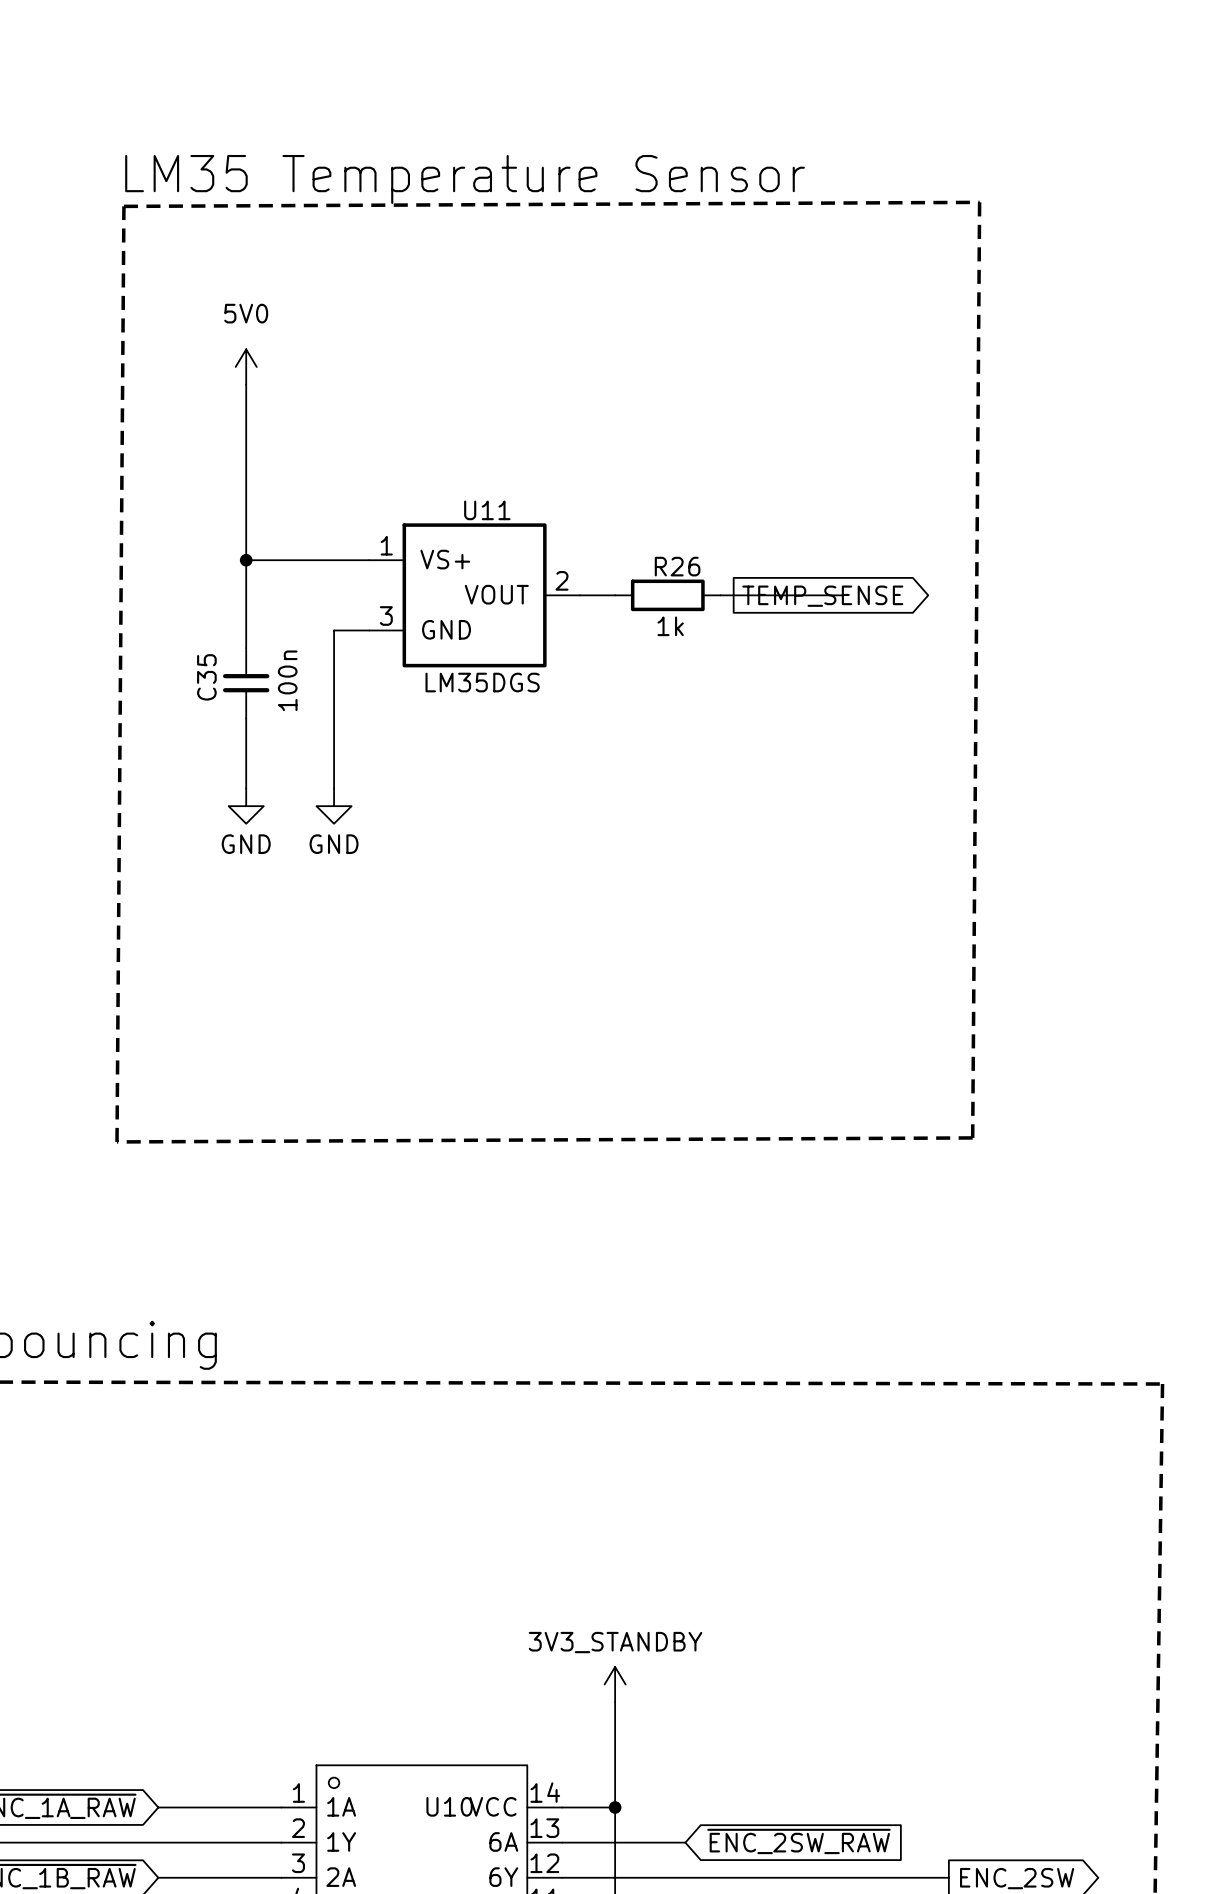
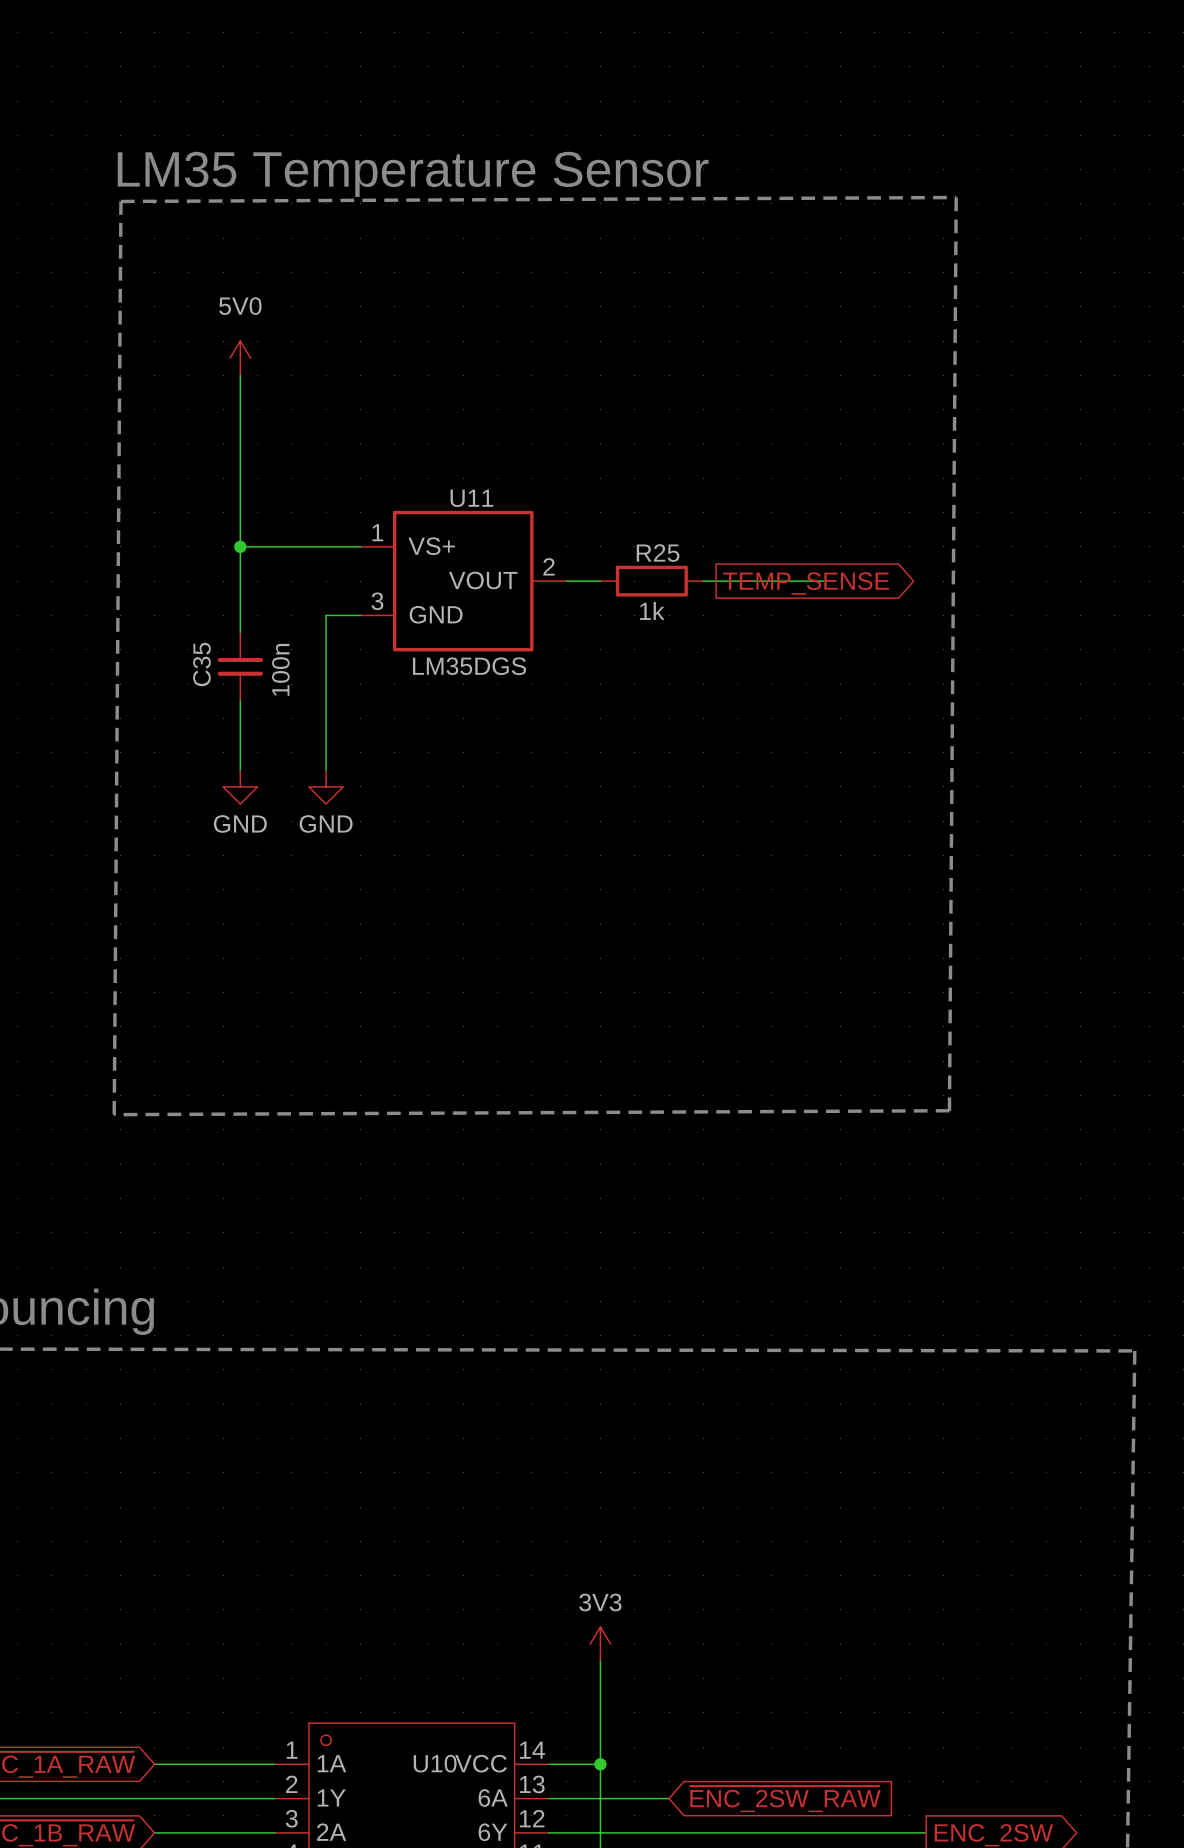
R26 name: R26 (677, 566) -> R25 (658, 553)
power symbol: 3V3_STANDBY (615, 1684) -> 3V3 (600, 1644)

